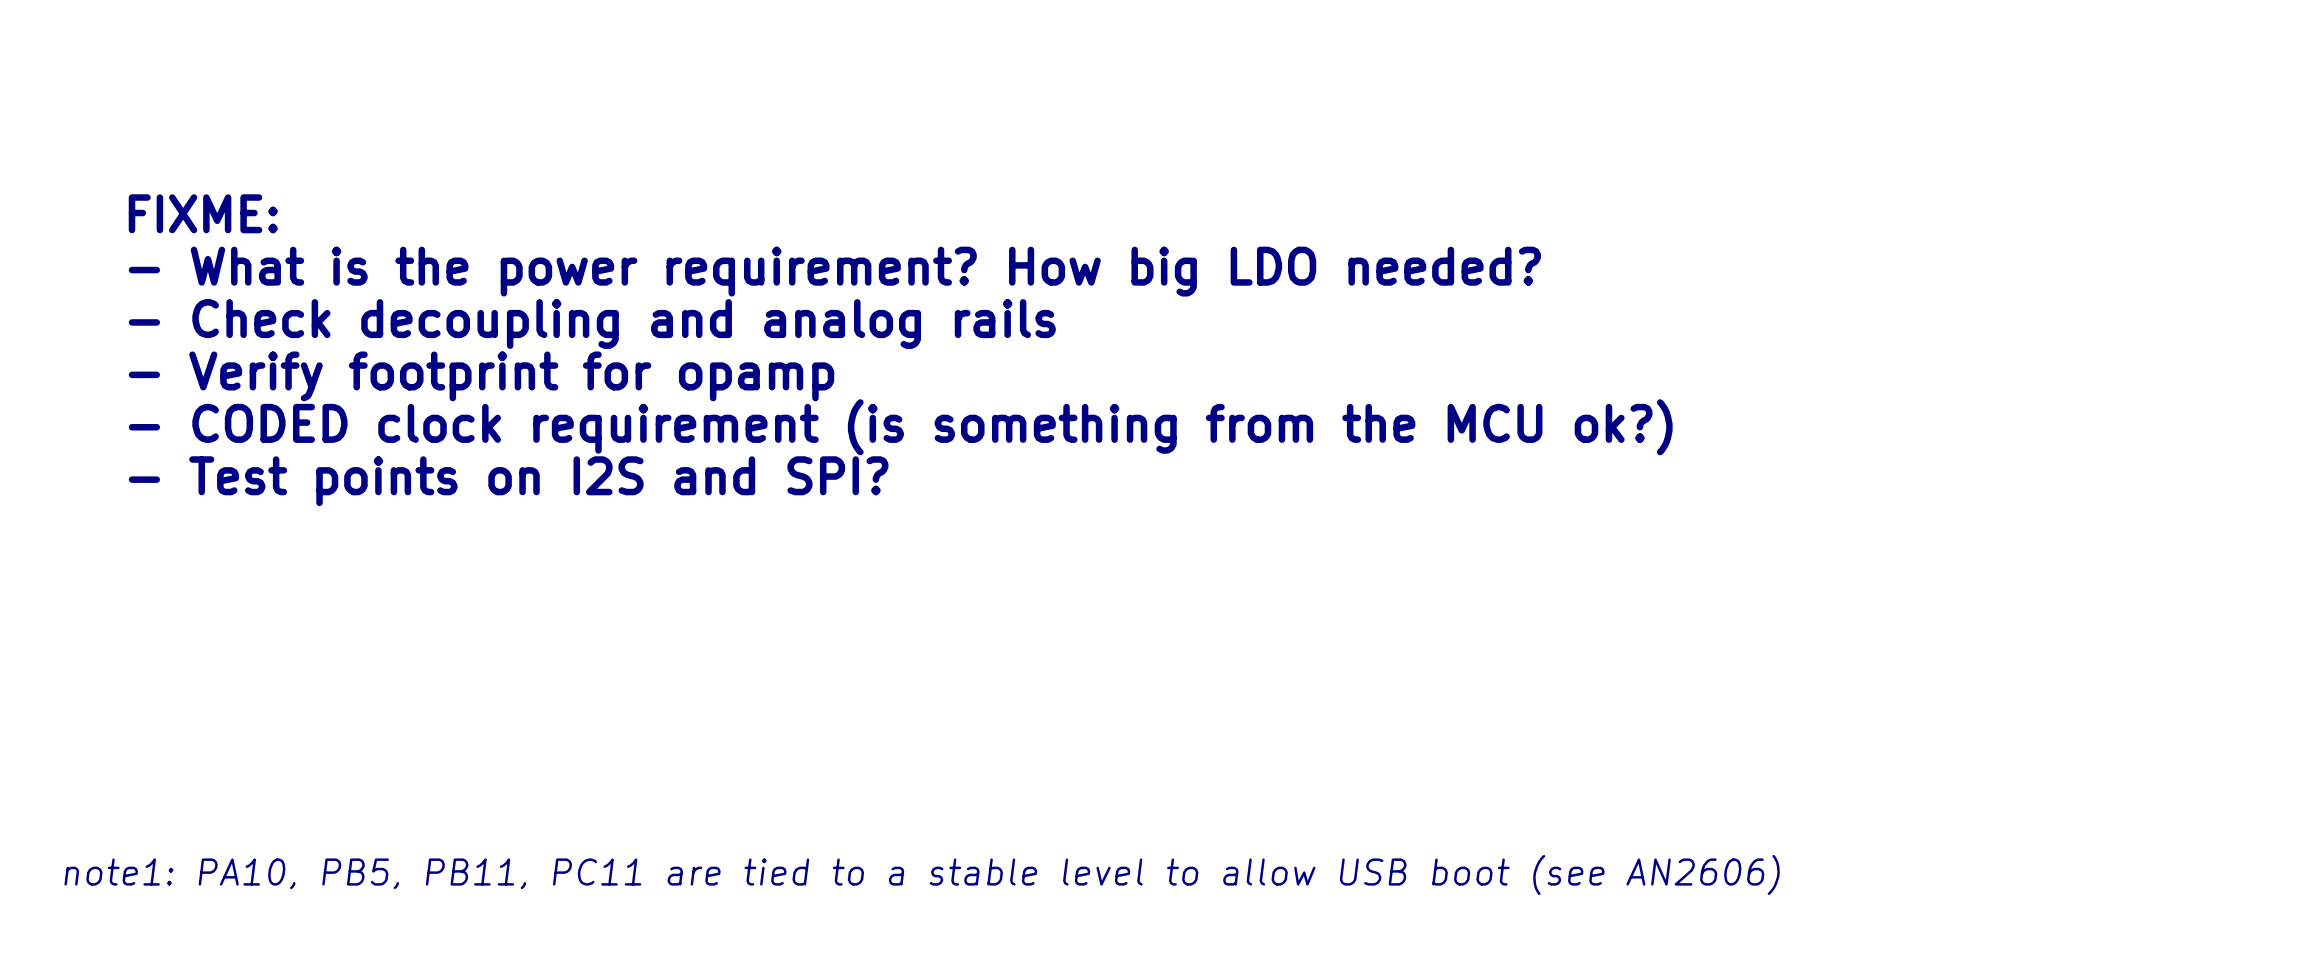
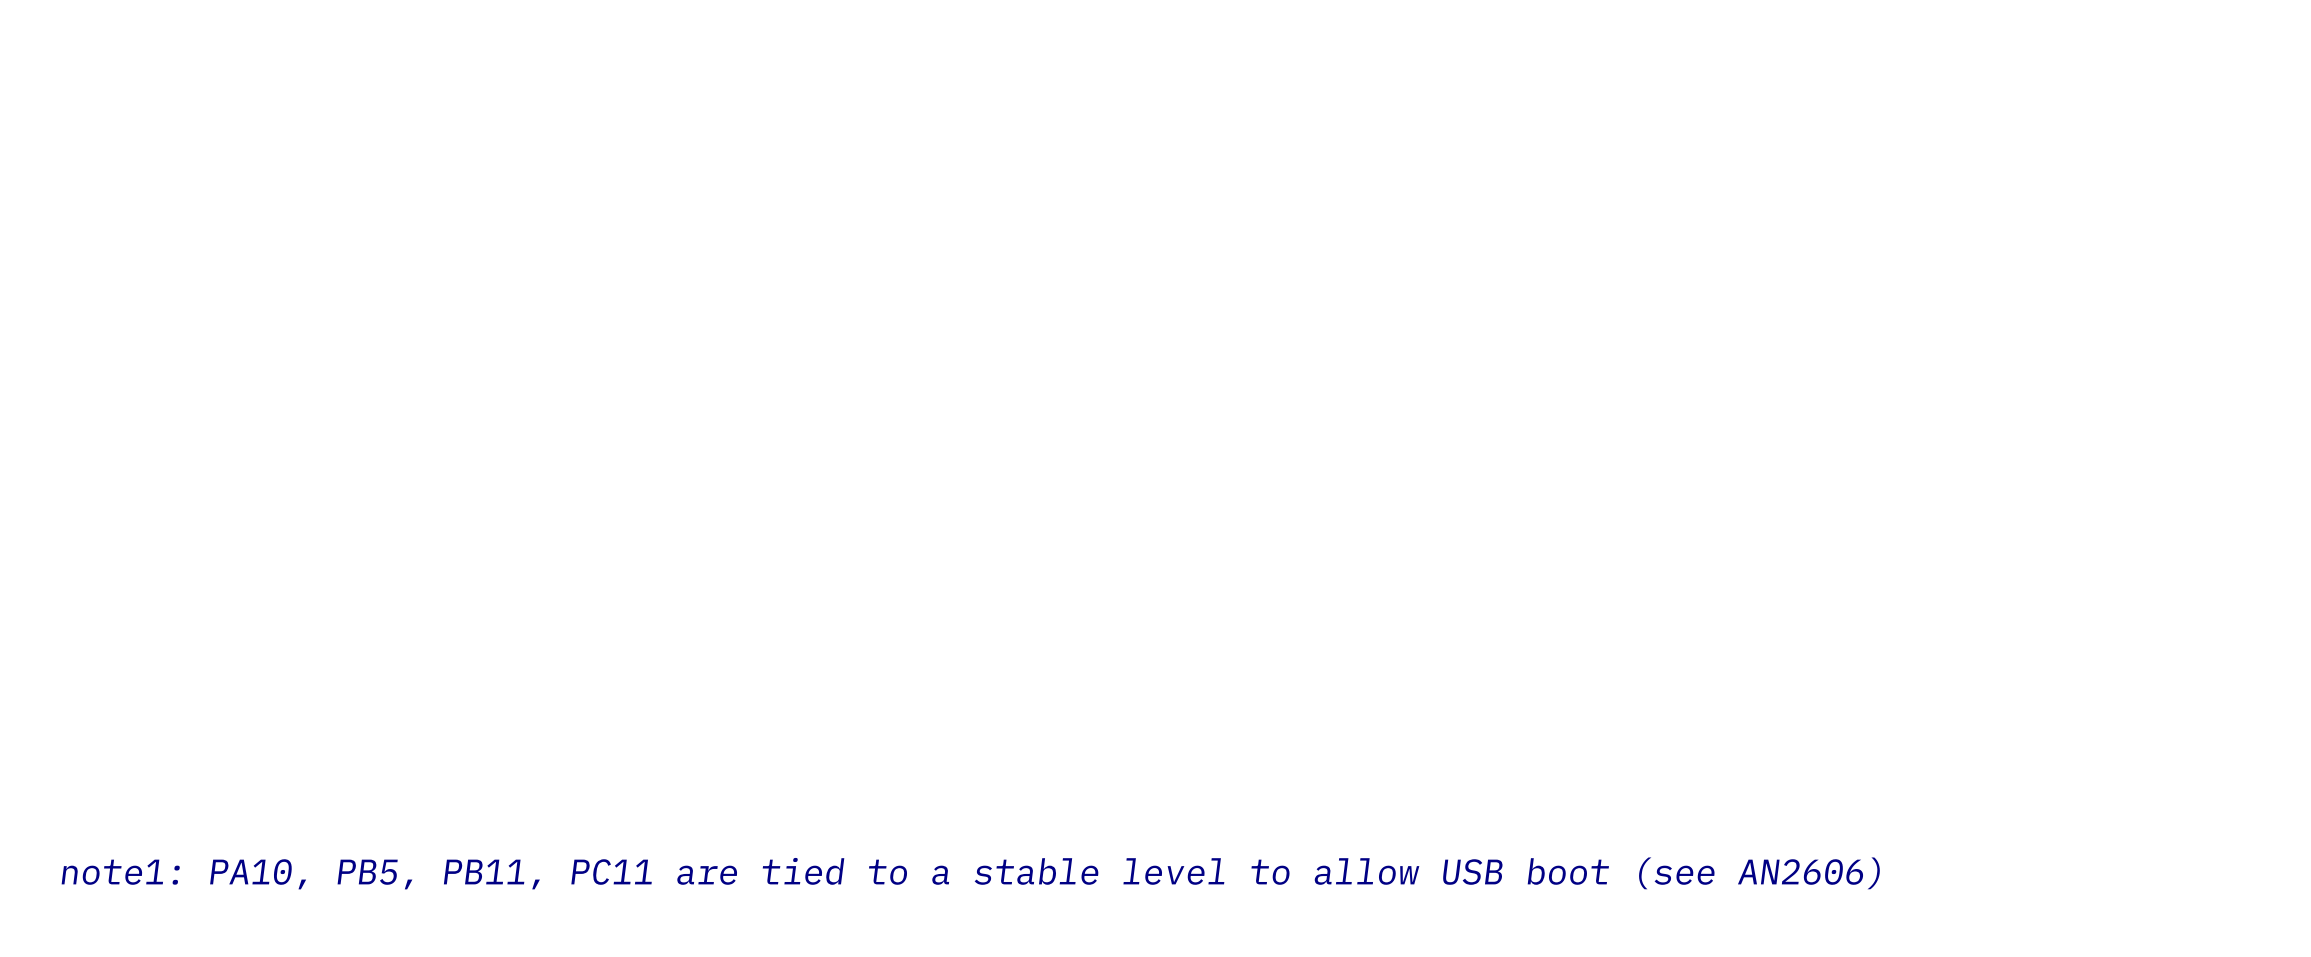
text: FIXME: (203, 213) -> none
text: - What is the power requirement? How big LDO needed? (834, 271) -> none
text: - Check decoupling and analog rails (592, 324) -> none
text: - Verify footprint for opamp (481, 376) -> none
text: - CODED clock requirement (is something from the MCU ok?) (900, 427) -> none
text: - Test points on I2S and SPI? (508, 481) -> none

